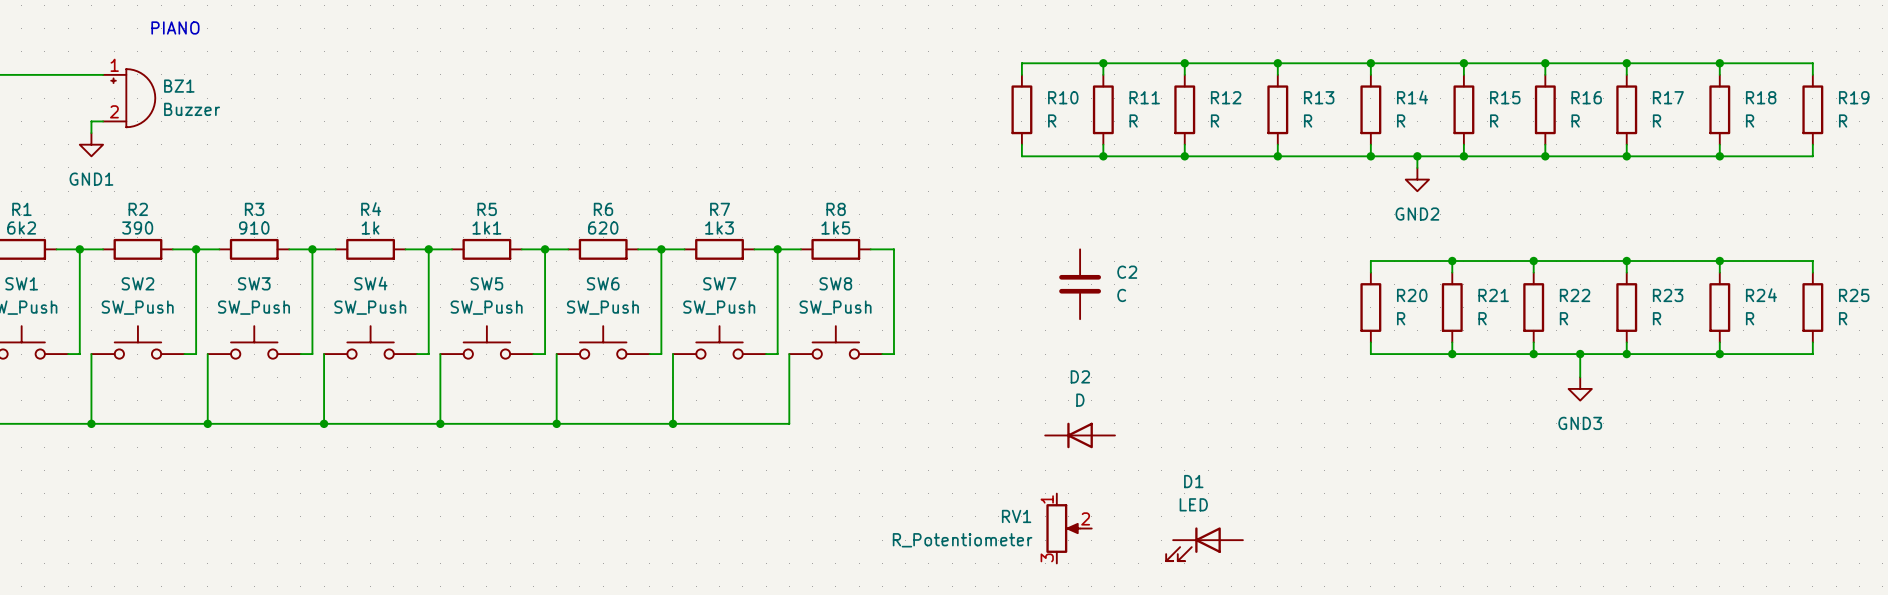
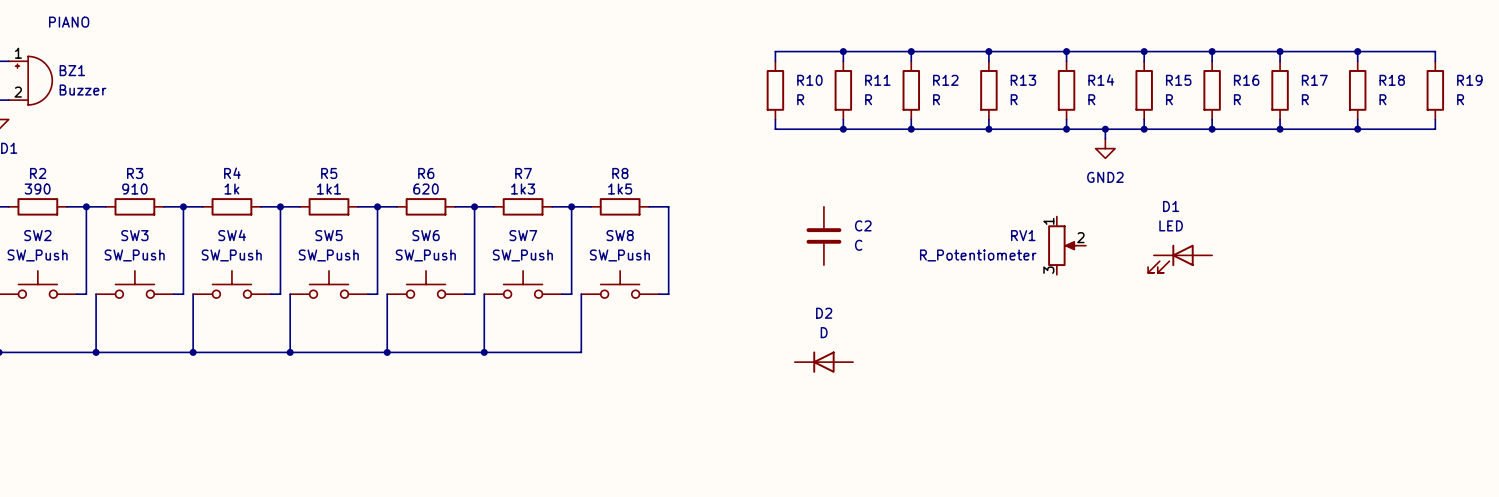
wire: (1452, 261) (1452, 272) -> none
junction: (1452, 261) -> none
wire: (1533, 261) (1533, 272) -> none
junction: (1533, 261) -> none
wire: (1626, 261) (1626, 272) -> none
junction: (1626, 261) -> none
wire: (1719, 261) (1719, 272) -> none
junction: (1719, 261) -> none
wire: (1370, 272) (1370, 261) (1812, 261) (1812, 272) -> none
R20: R (1370, 307) -> none
R21: R (1452, 307) -> none
R22: R (1533, 307) -> none
R23: R (1626, 307) -> none
R24: R (1719, 307) -> none
R25: R (1812, 307) -> none
wire: (1370, 342) (1370, 354) (1812, 354) (1812, 342) -> none
wire: (1452, 342) (1452, 354) -> none
wire: (1533, 342) (1533, 354) -> none
wire: (1626, 342) (1626, 354) -> none
wire: (1719, 342) (1719, 354) -> none
junction: (1452, 354) -> none
junction: (1533, 354) -> none
wire: (1580, 354) (1580, 377) -> none
junction: (1580, 354) -> none
junction: (1626, 354) -> none
junction: (1719, 354) -> none
power symbol: GND3 (1580, 388) -> none
RV1 position: (1069, 528) -> (1067, 245)
D1 position: (1204, 544) -> (1180, 258)

